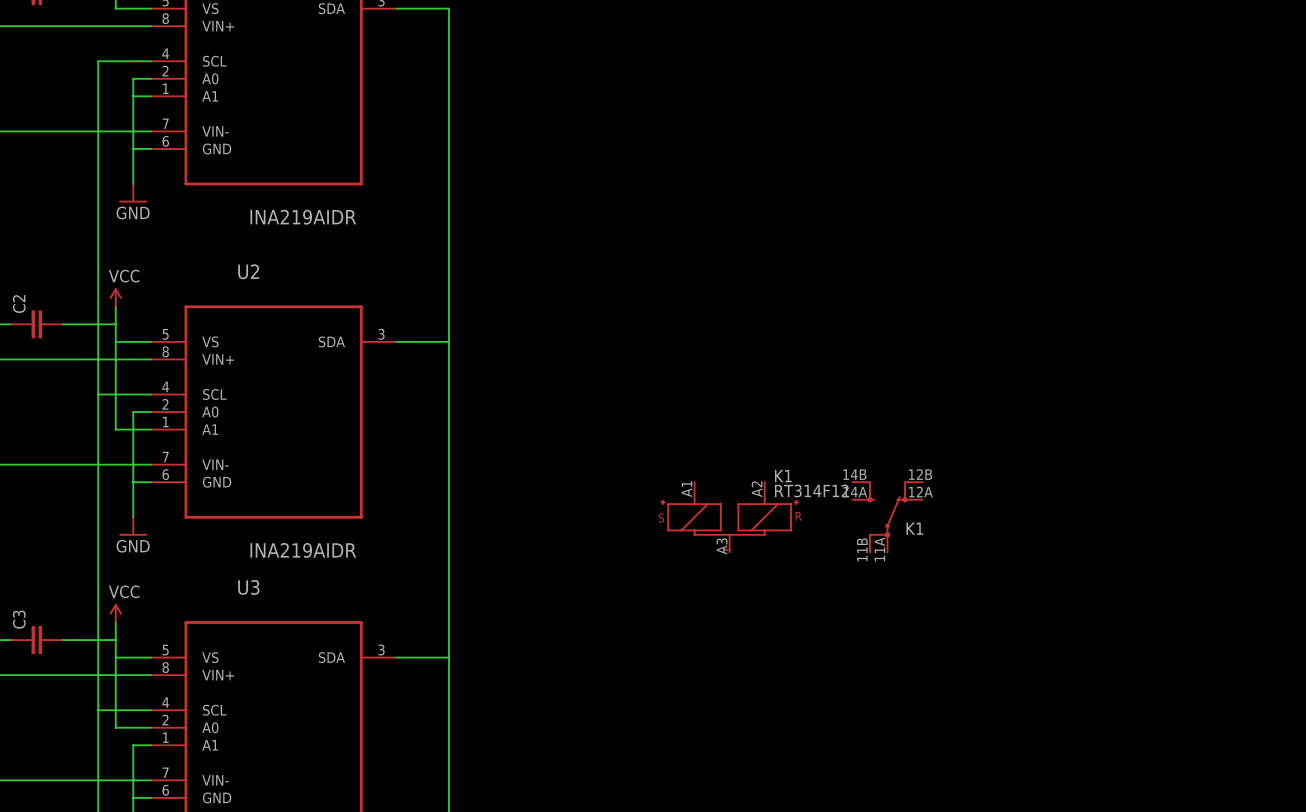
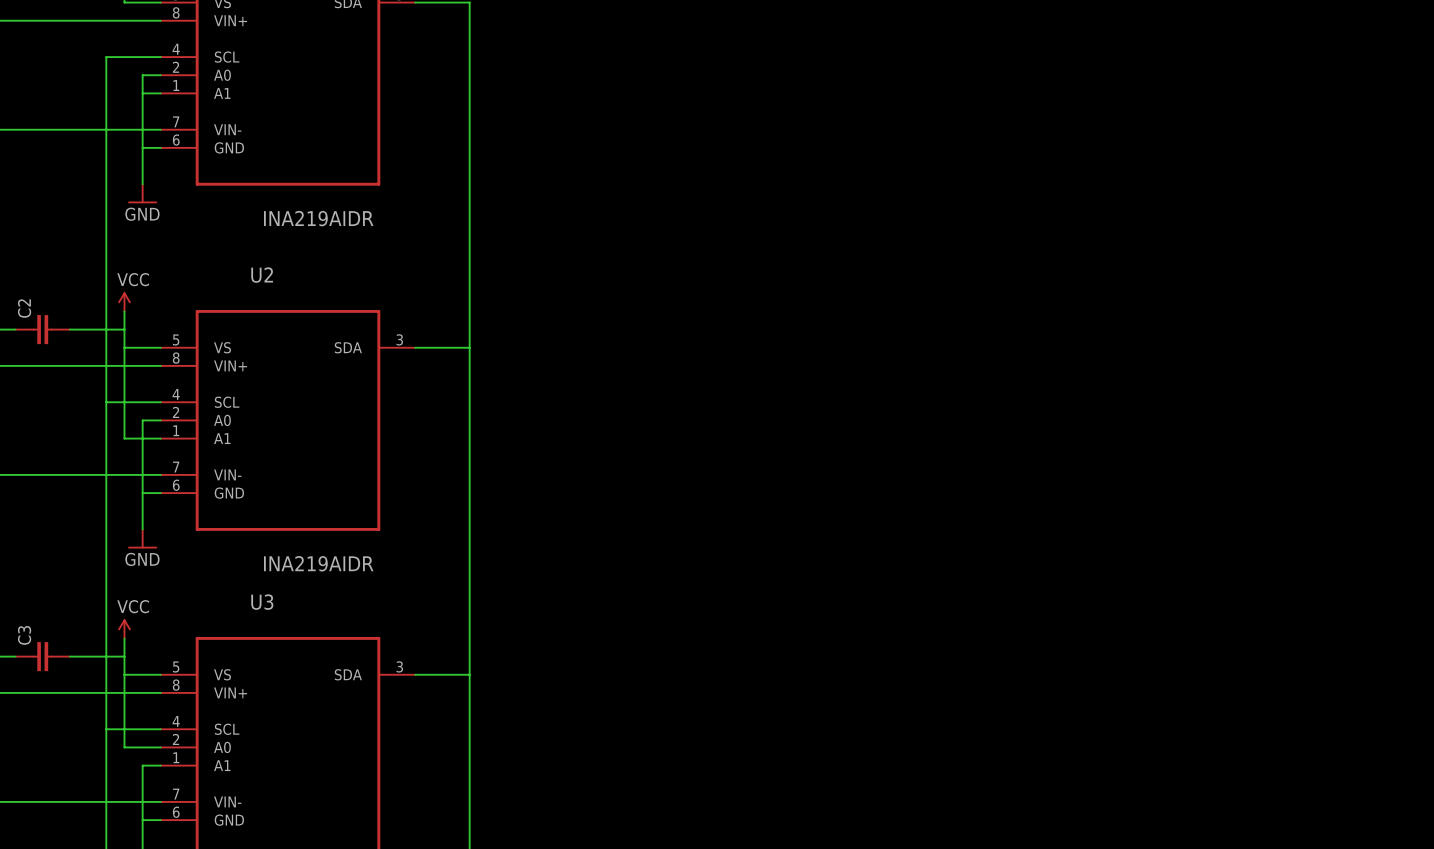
K1: RT314F12 (729, 517) -> none
K1: (887, 517) -> none

